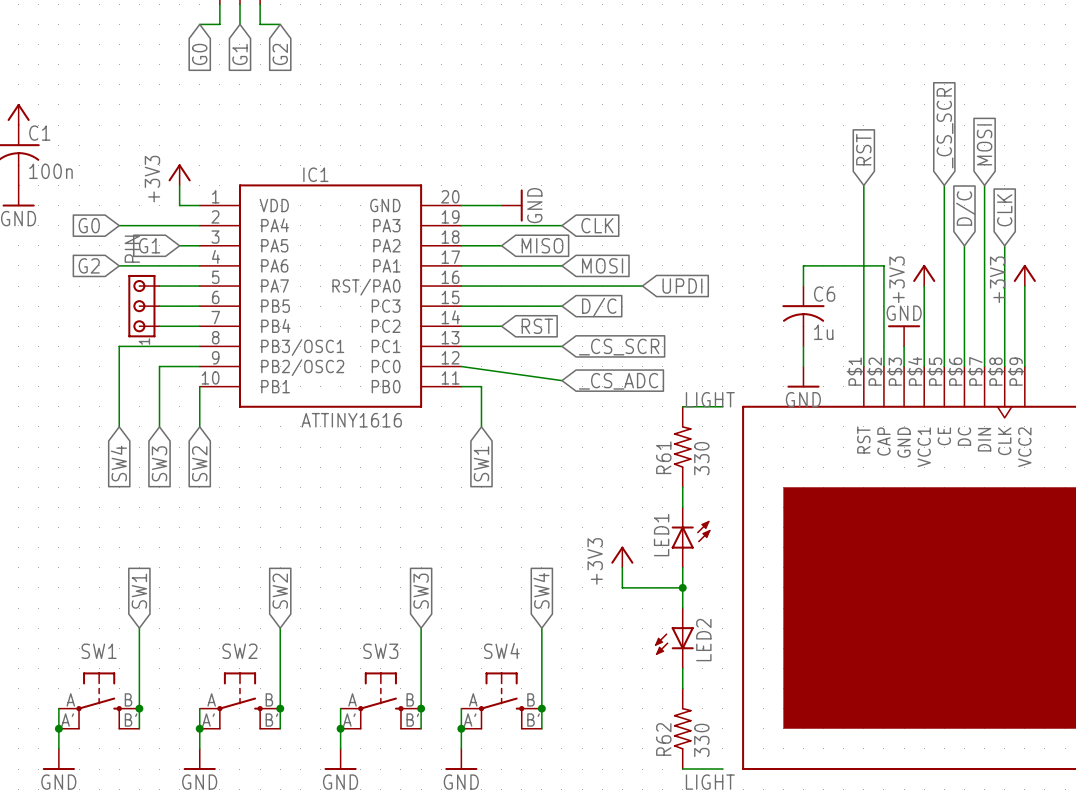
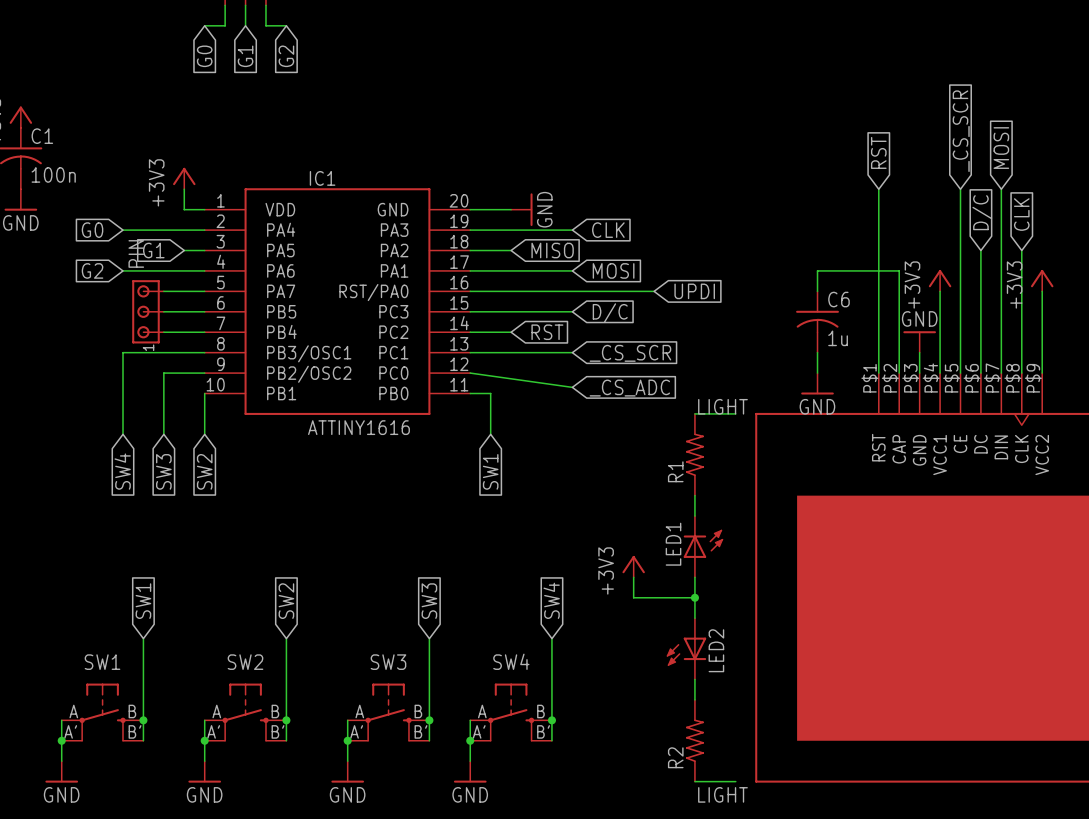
R61 name: R61 (663, 457) -> R1 (675, 471)
R61 value: 330 (701, 458) -> none
R62 name: R62 (663, 739) -> R2 (675, 757)
R62 value: 330 (701, 740) -> none

